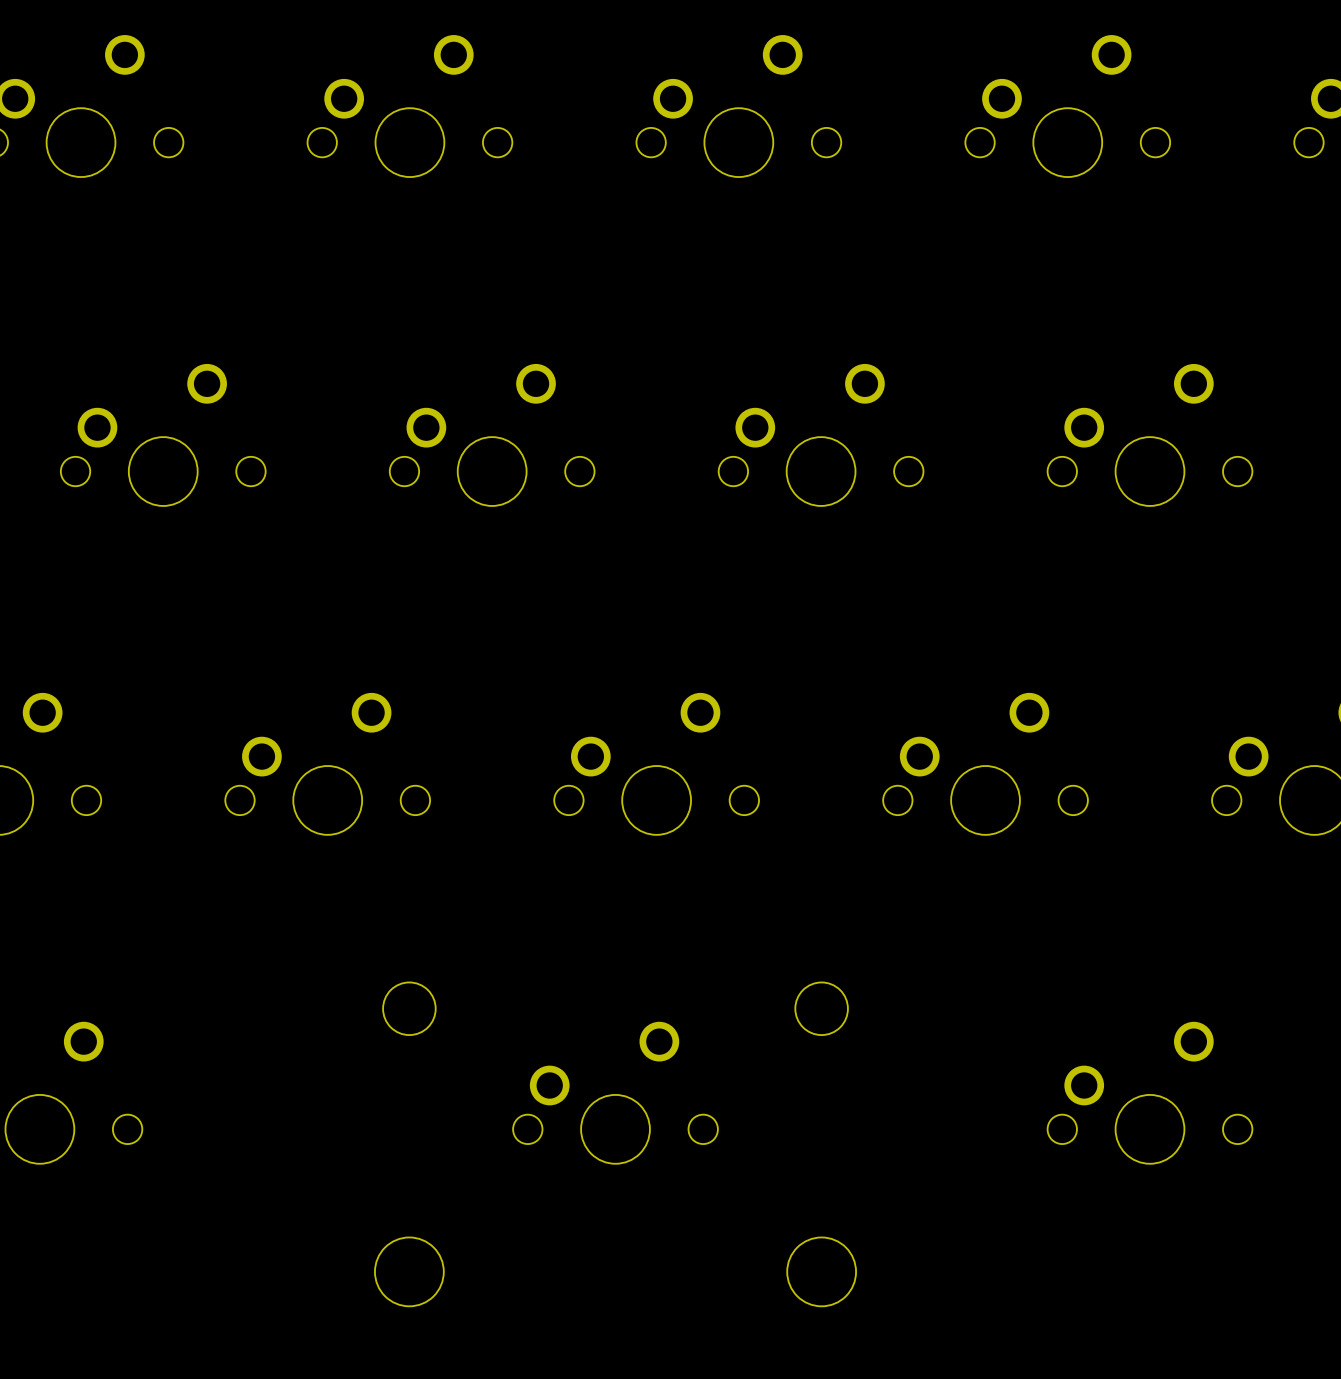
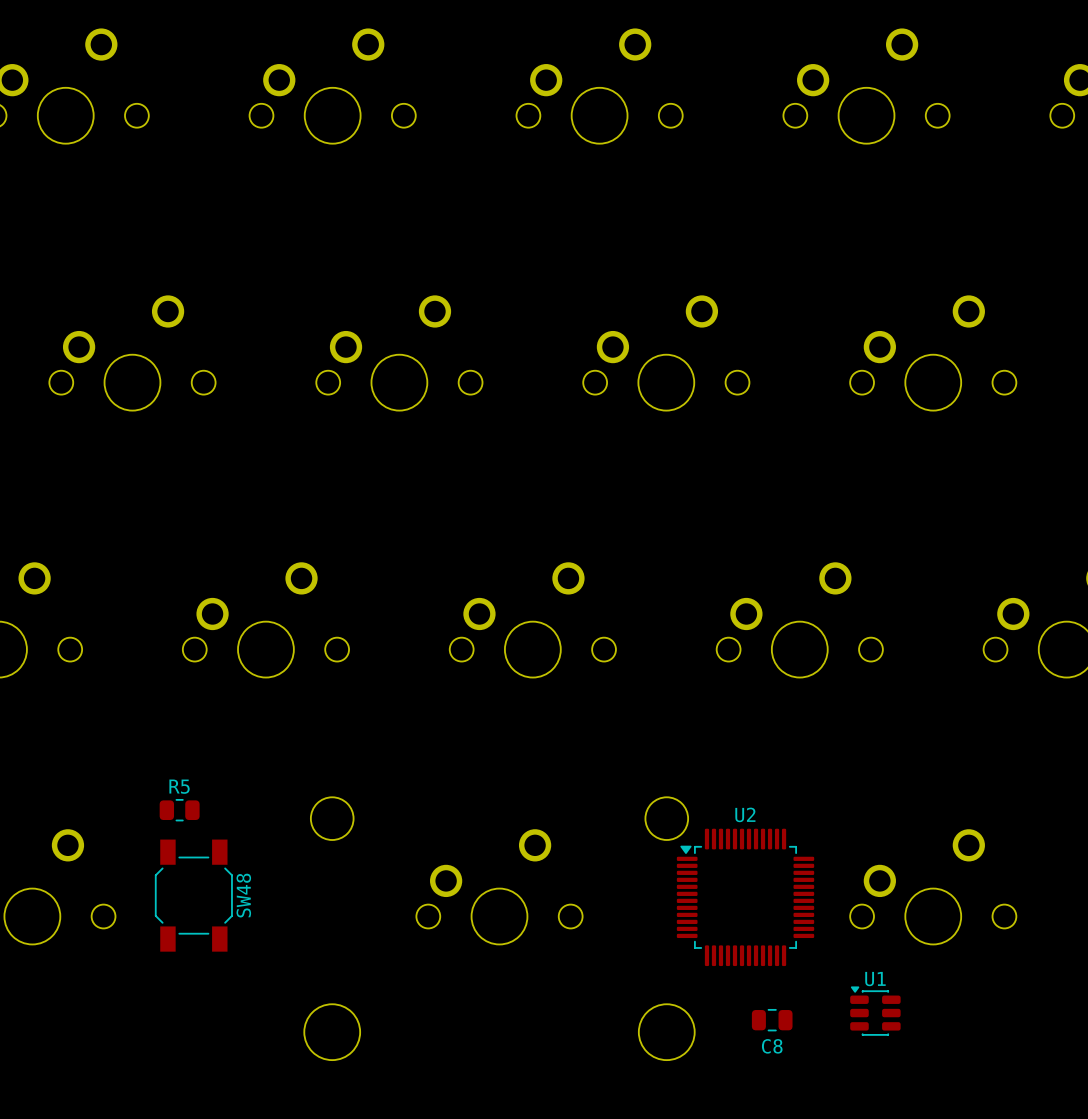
R5: none -> (179, 810)
SW48: none -> (193, 895)
U2: none -> (745, 897)
U1: none -> (875, 1011)
C8: none -> (772, 1020)

